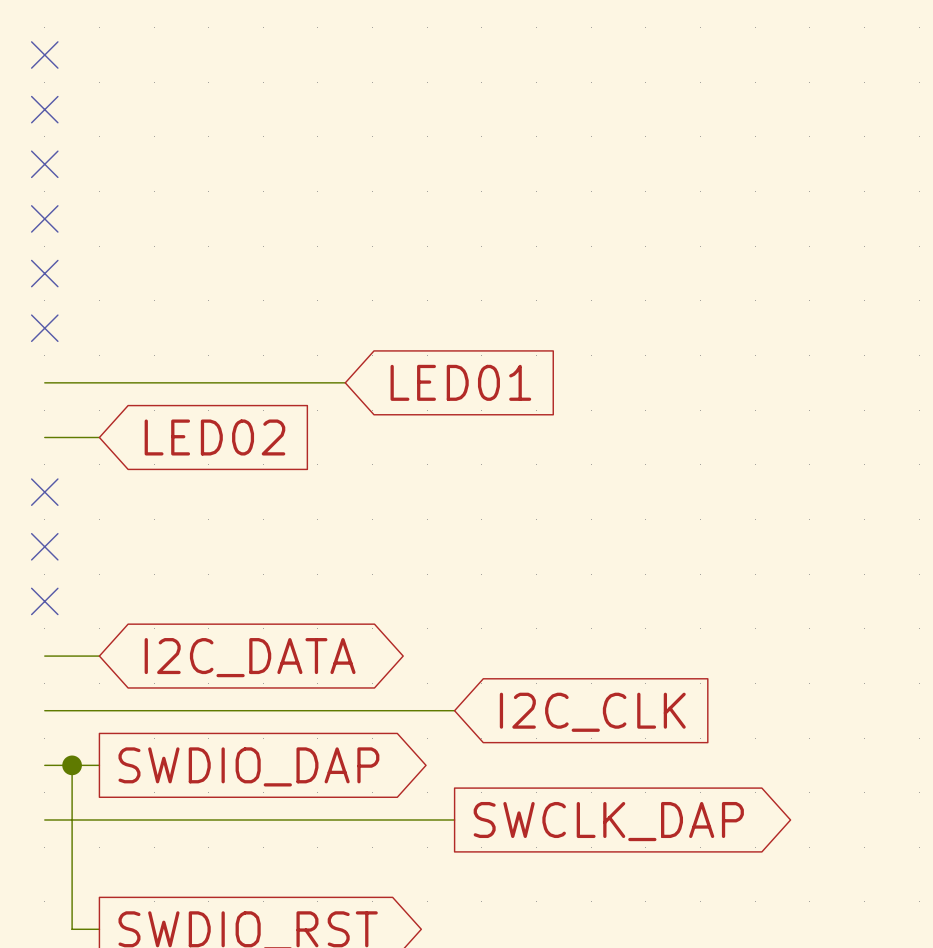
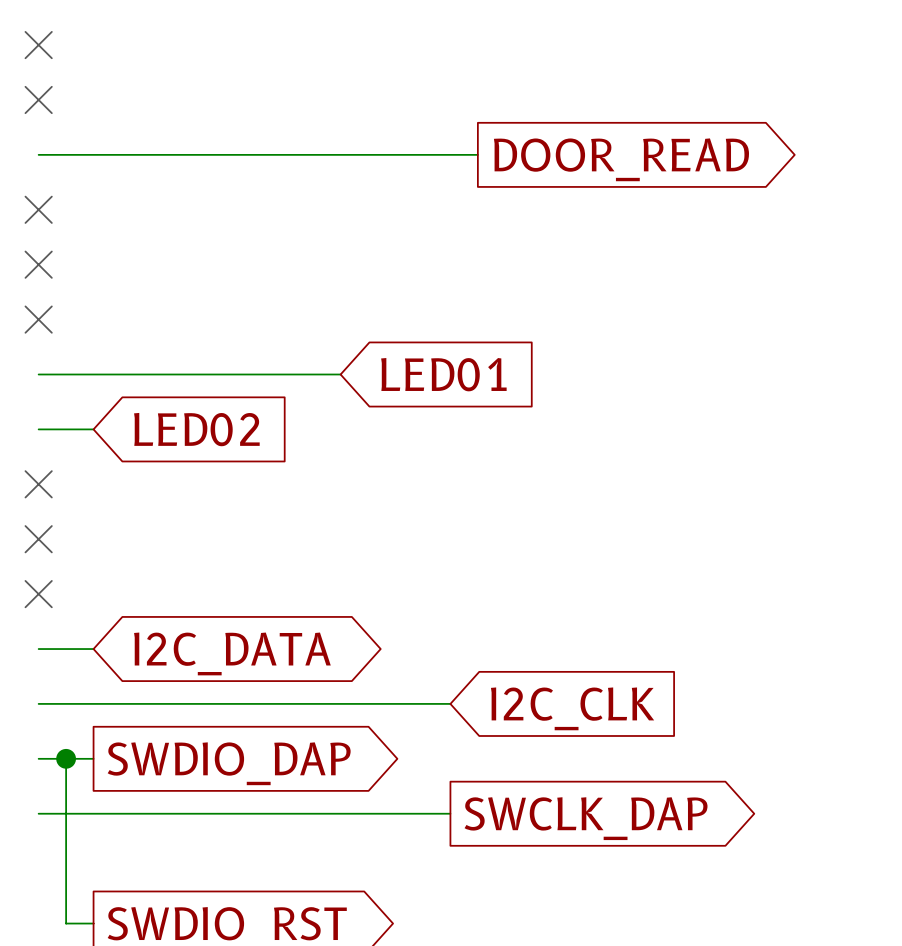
wire: none -> (38, 154) (477, 154)
no-connect mark: (44, 164) -> none
global label: none -> DOOR_READ (621, 159)

